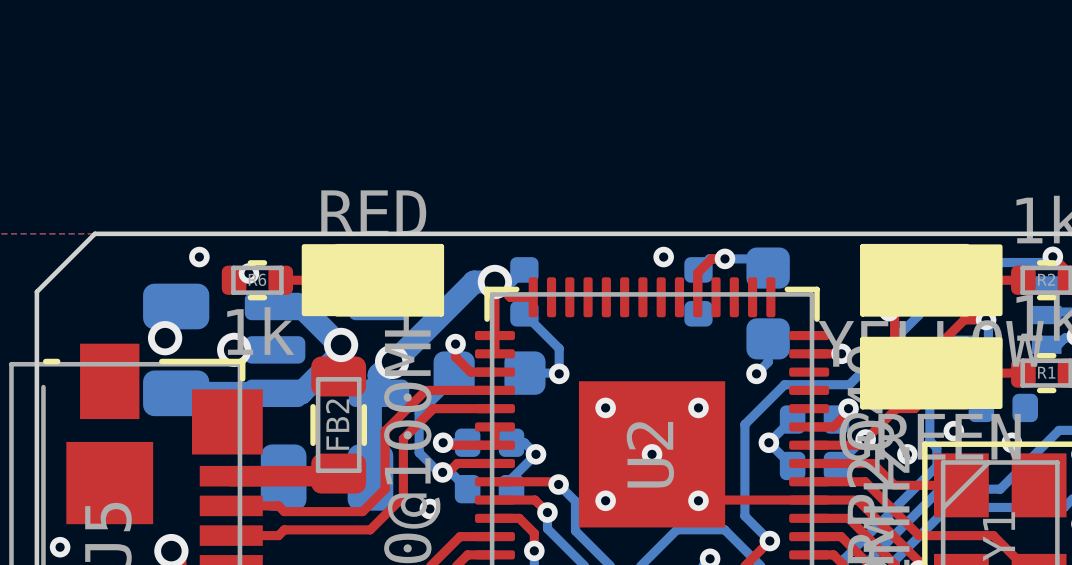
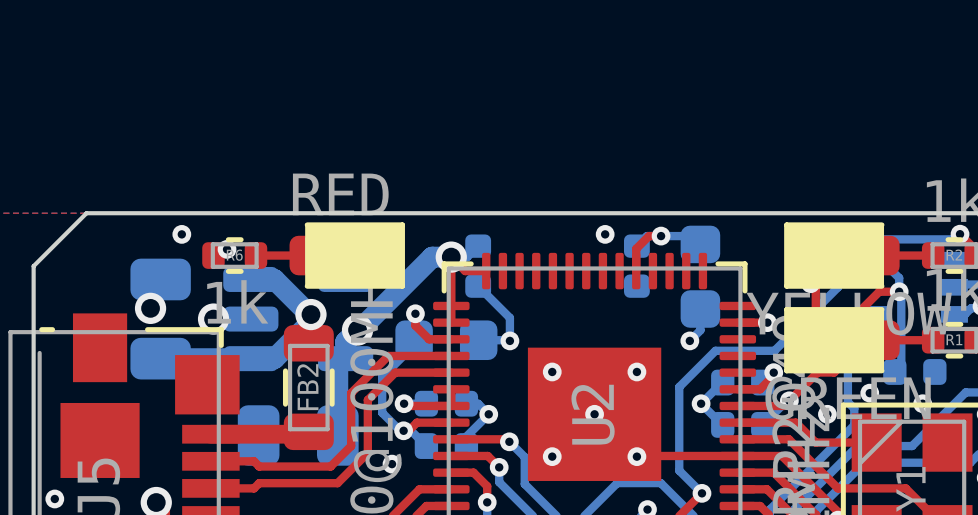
part footprint: [301, 243, 445, 317] -> [289, 222, 405, 289]
part footprint: [860, 243, 1003, 317] -> [784, 222, 900, 289]
part footprint: [860, 336, 1003, 410] -> [784, 307, 900, 374]

